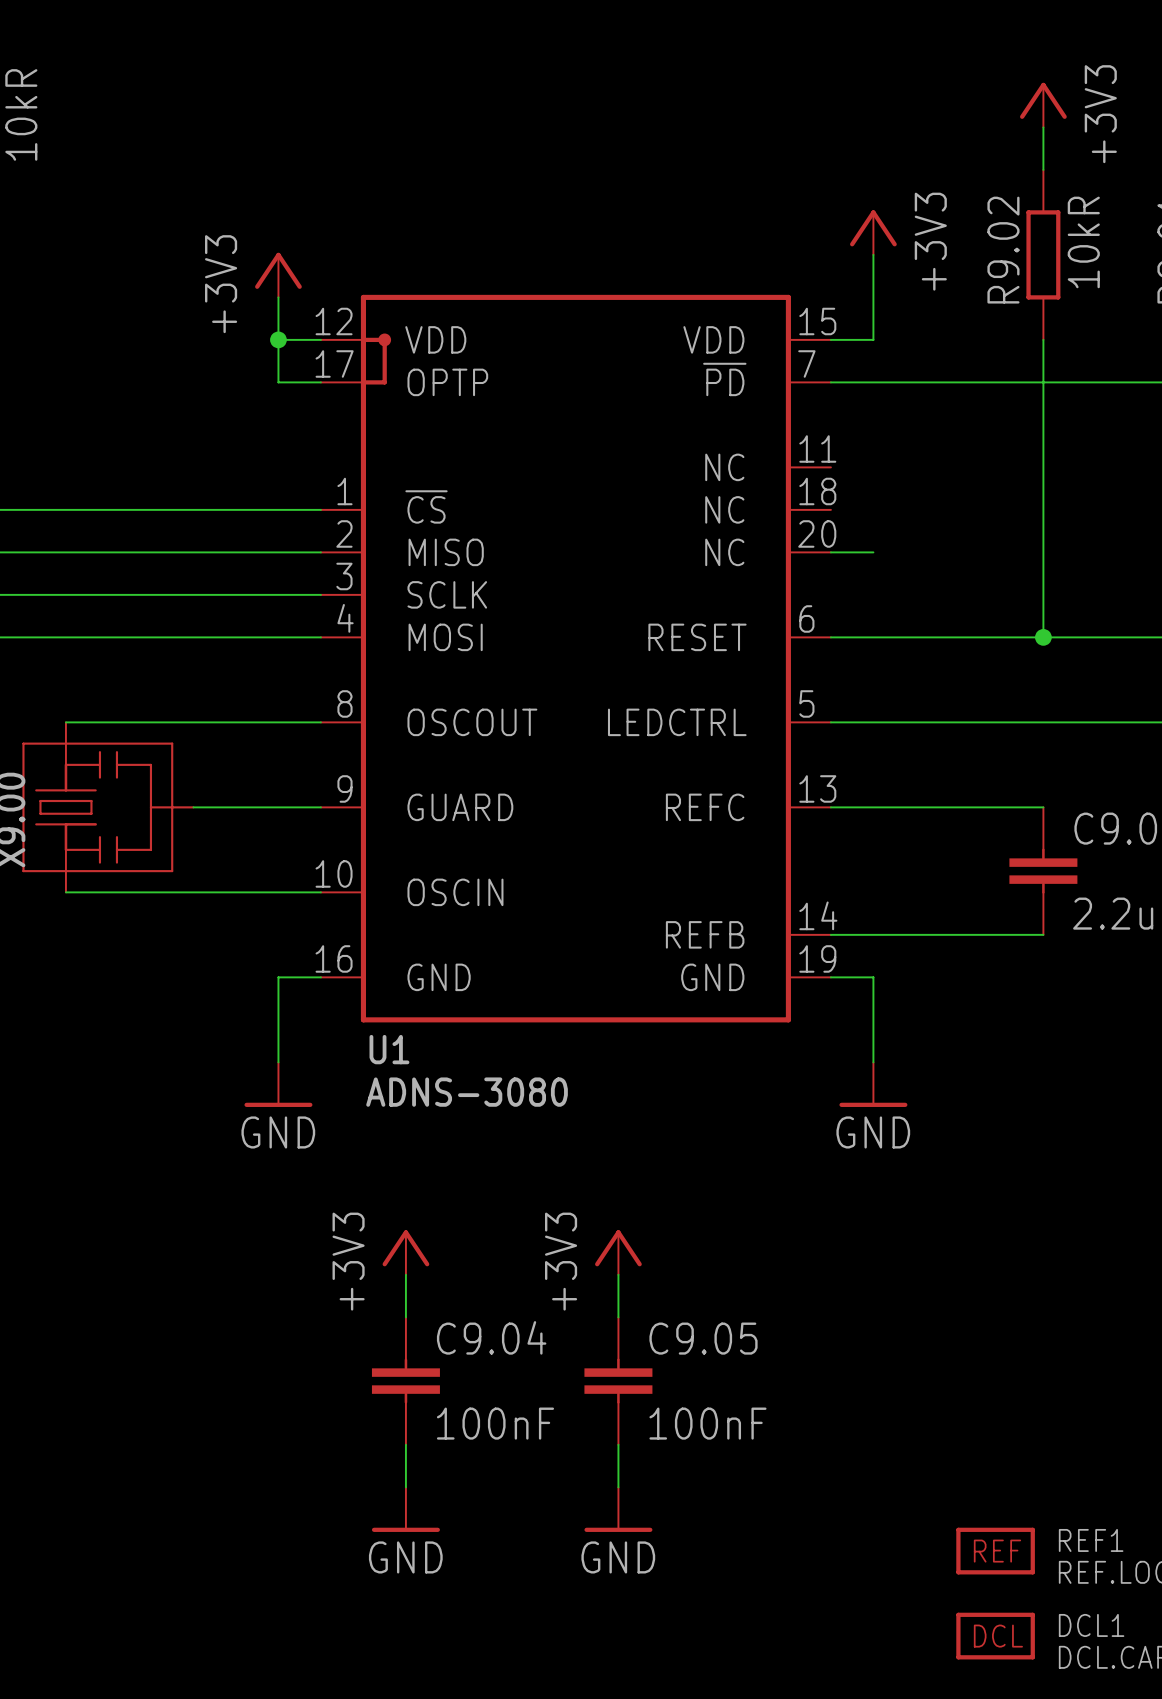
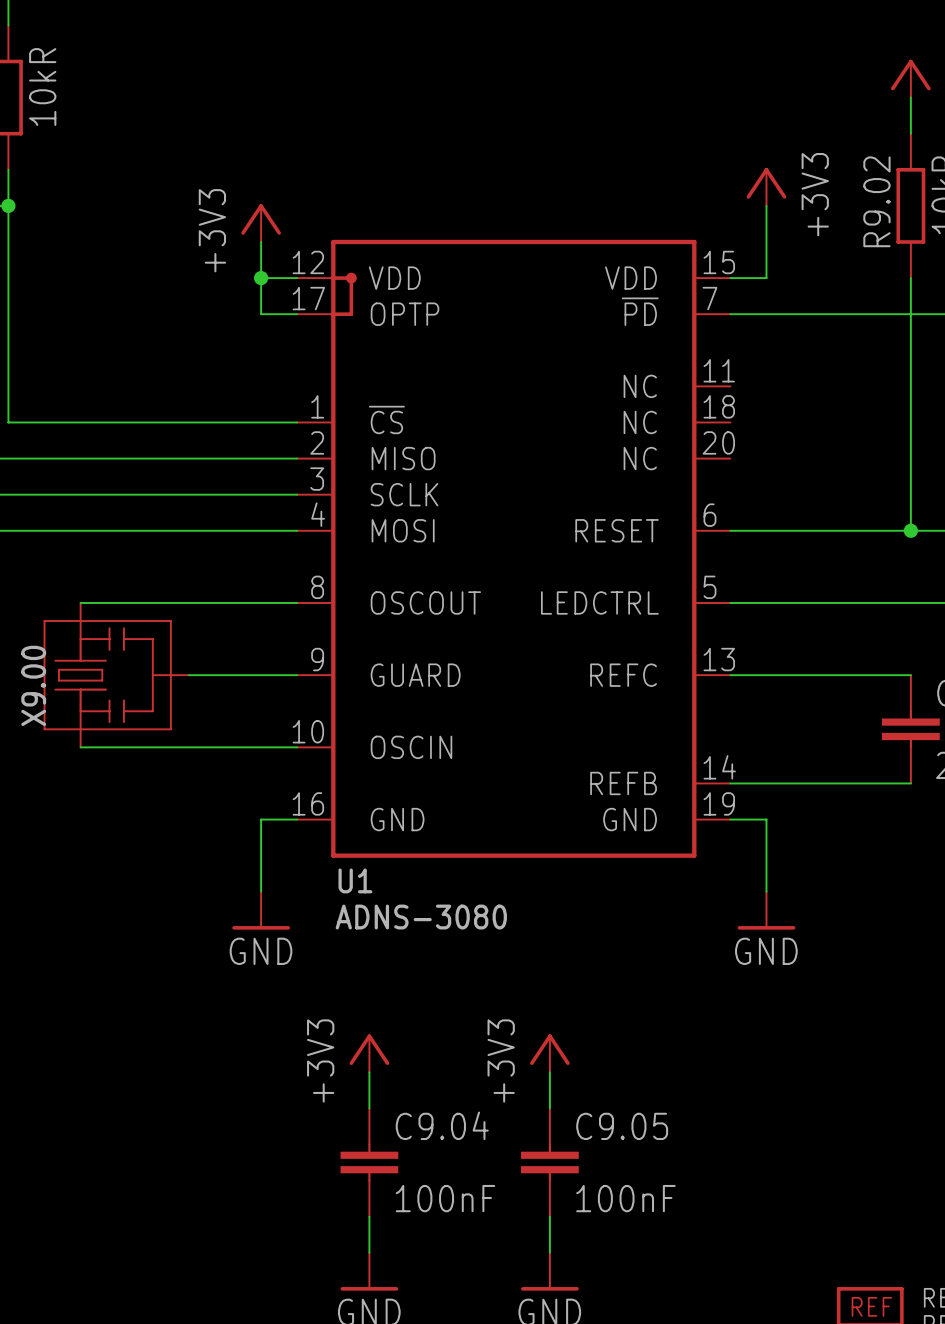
wire: (830, 552) (873, 552) -> none

